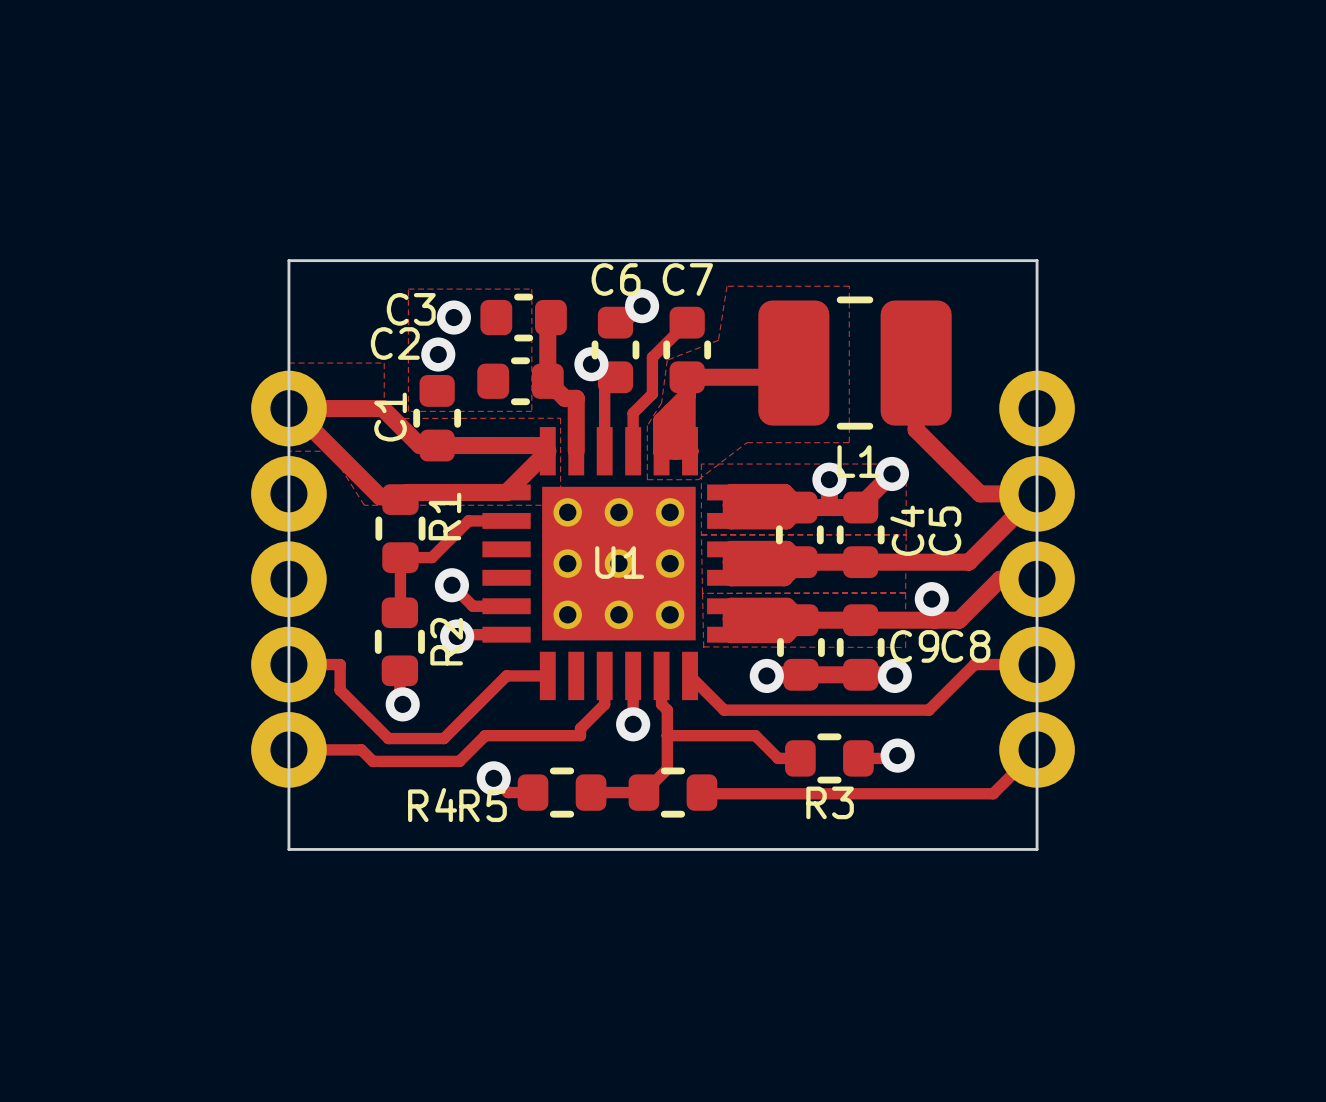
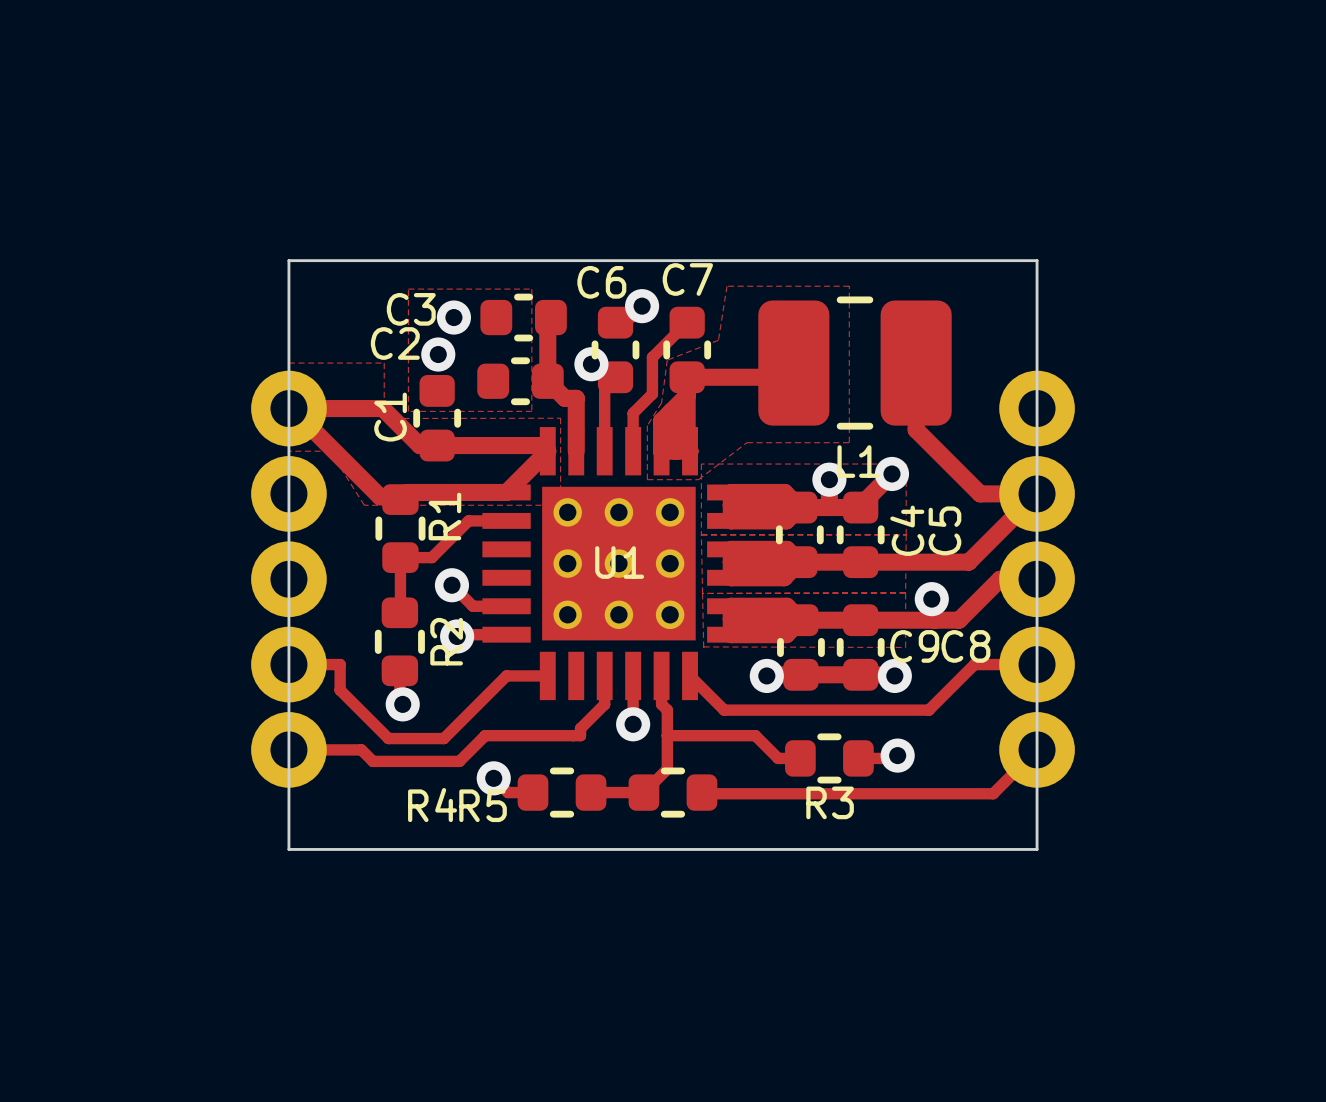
C6 name position: C6 (616, 279) -> C6 (601, 282)

